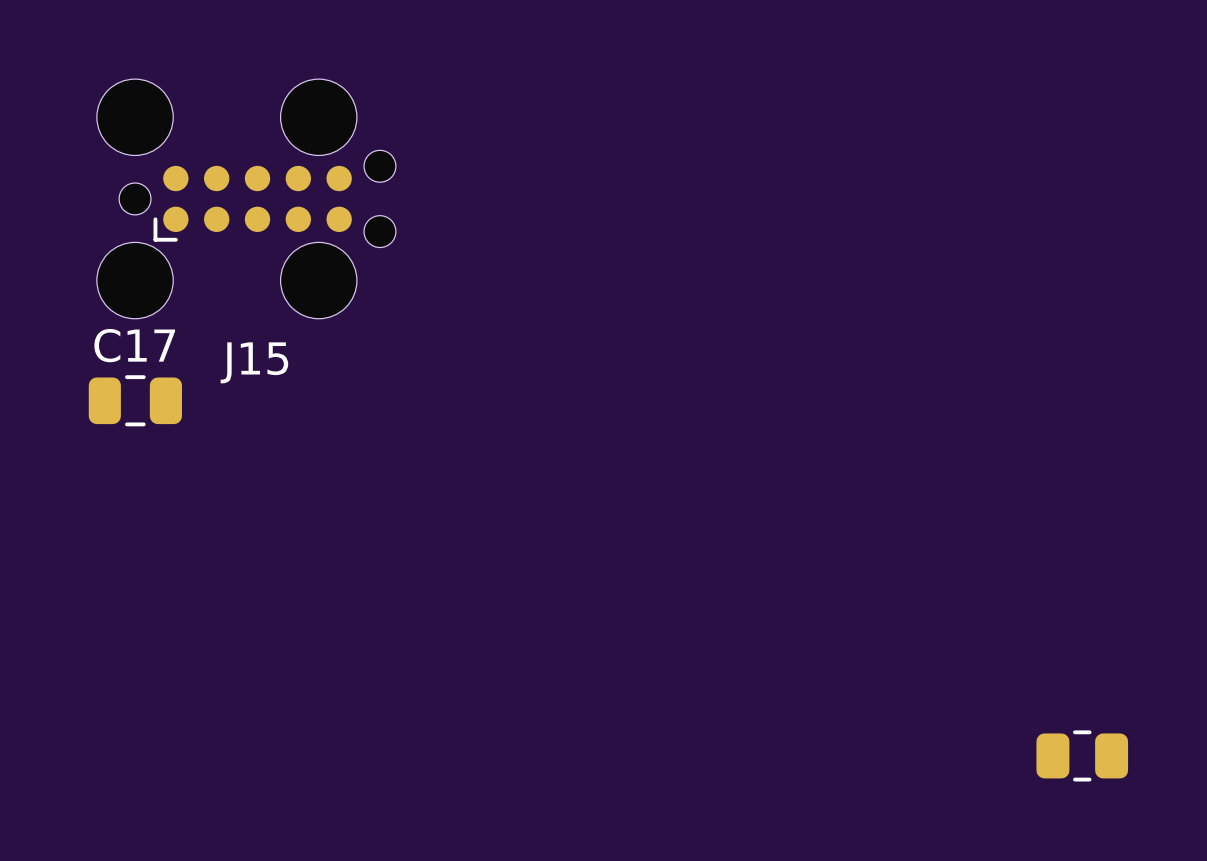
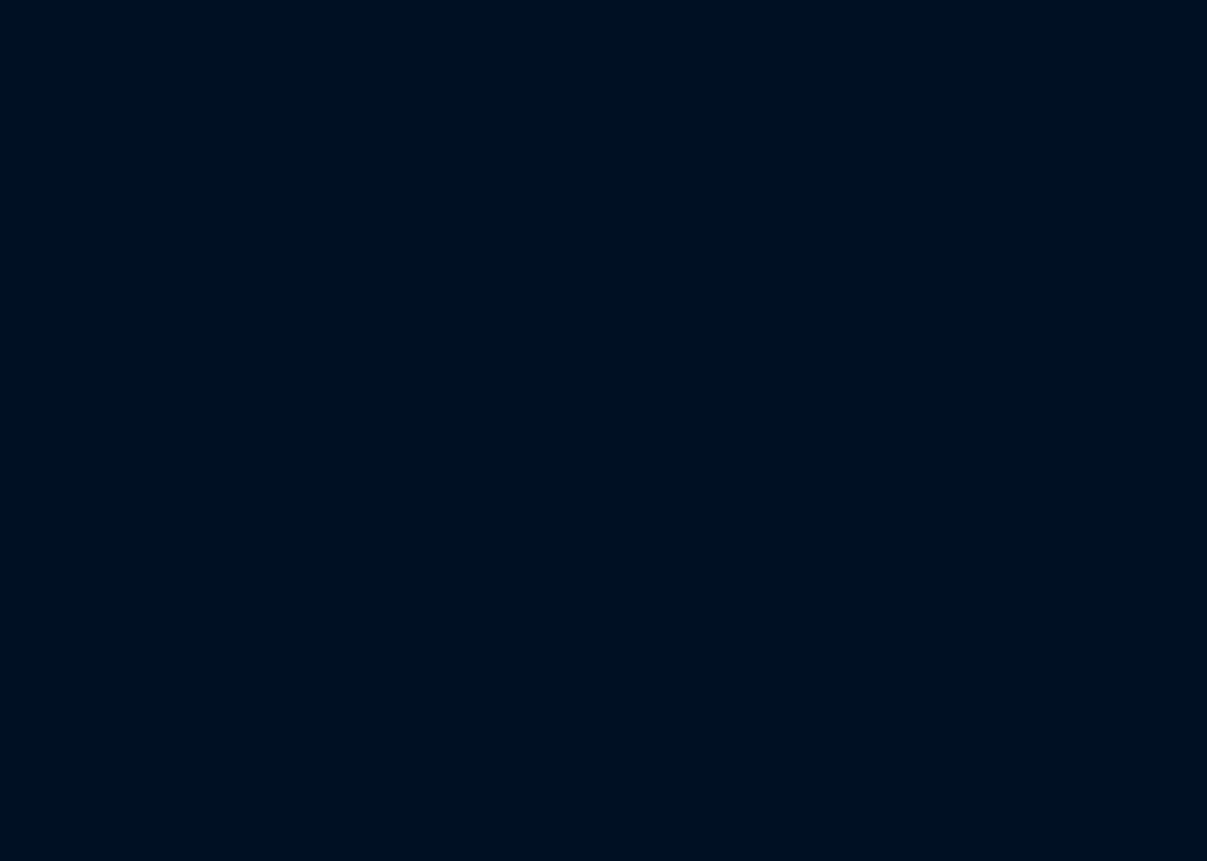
J15: (246, 198) -> none
C17: (135, 400) -> none
part: (1082, 755) -> none

